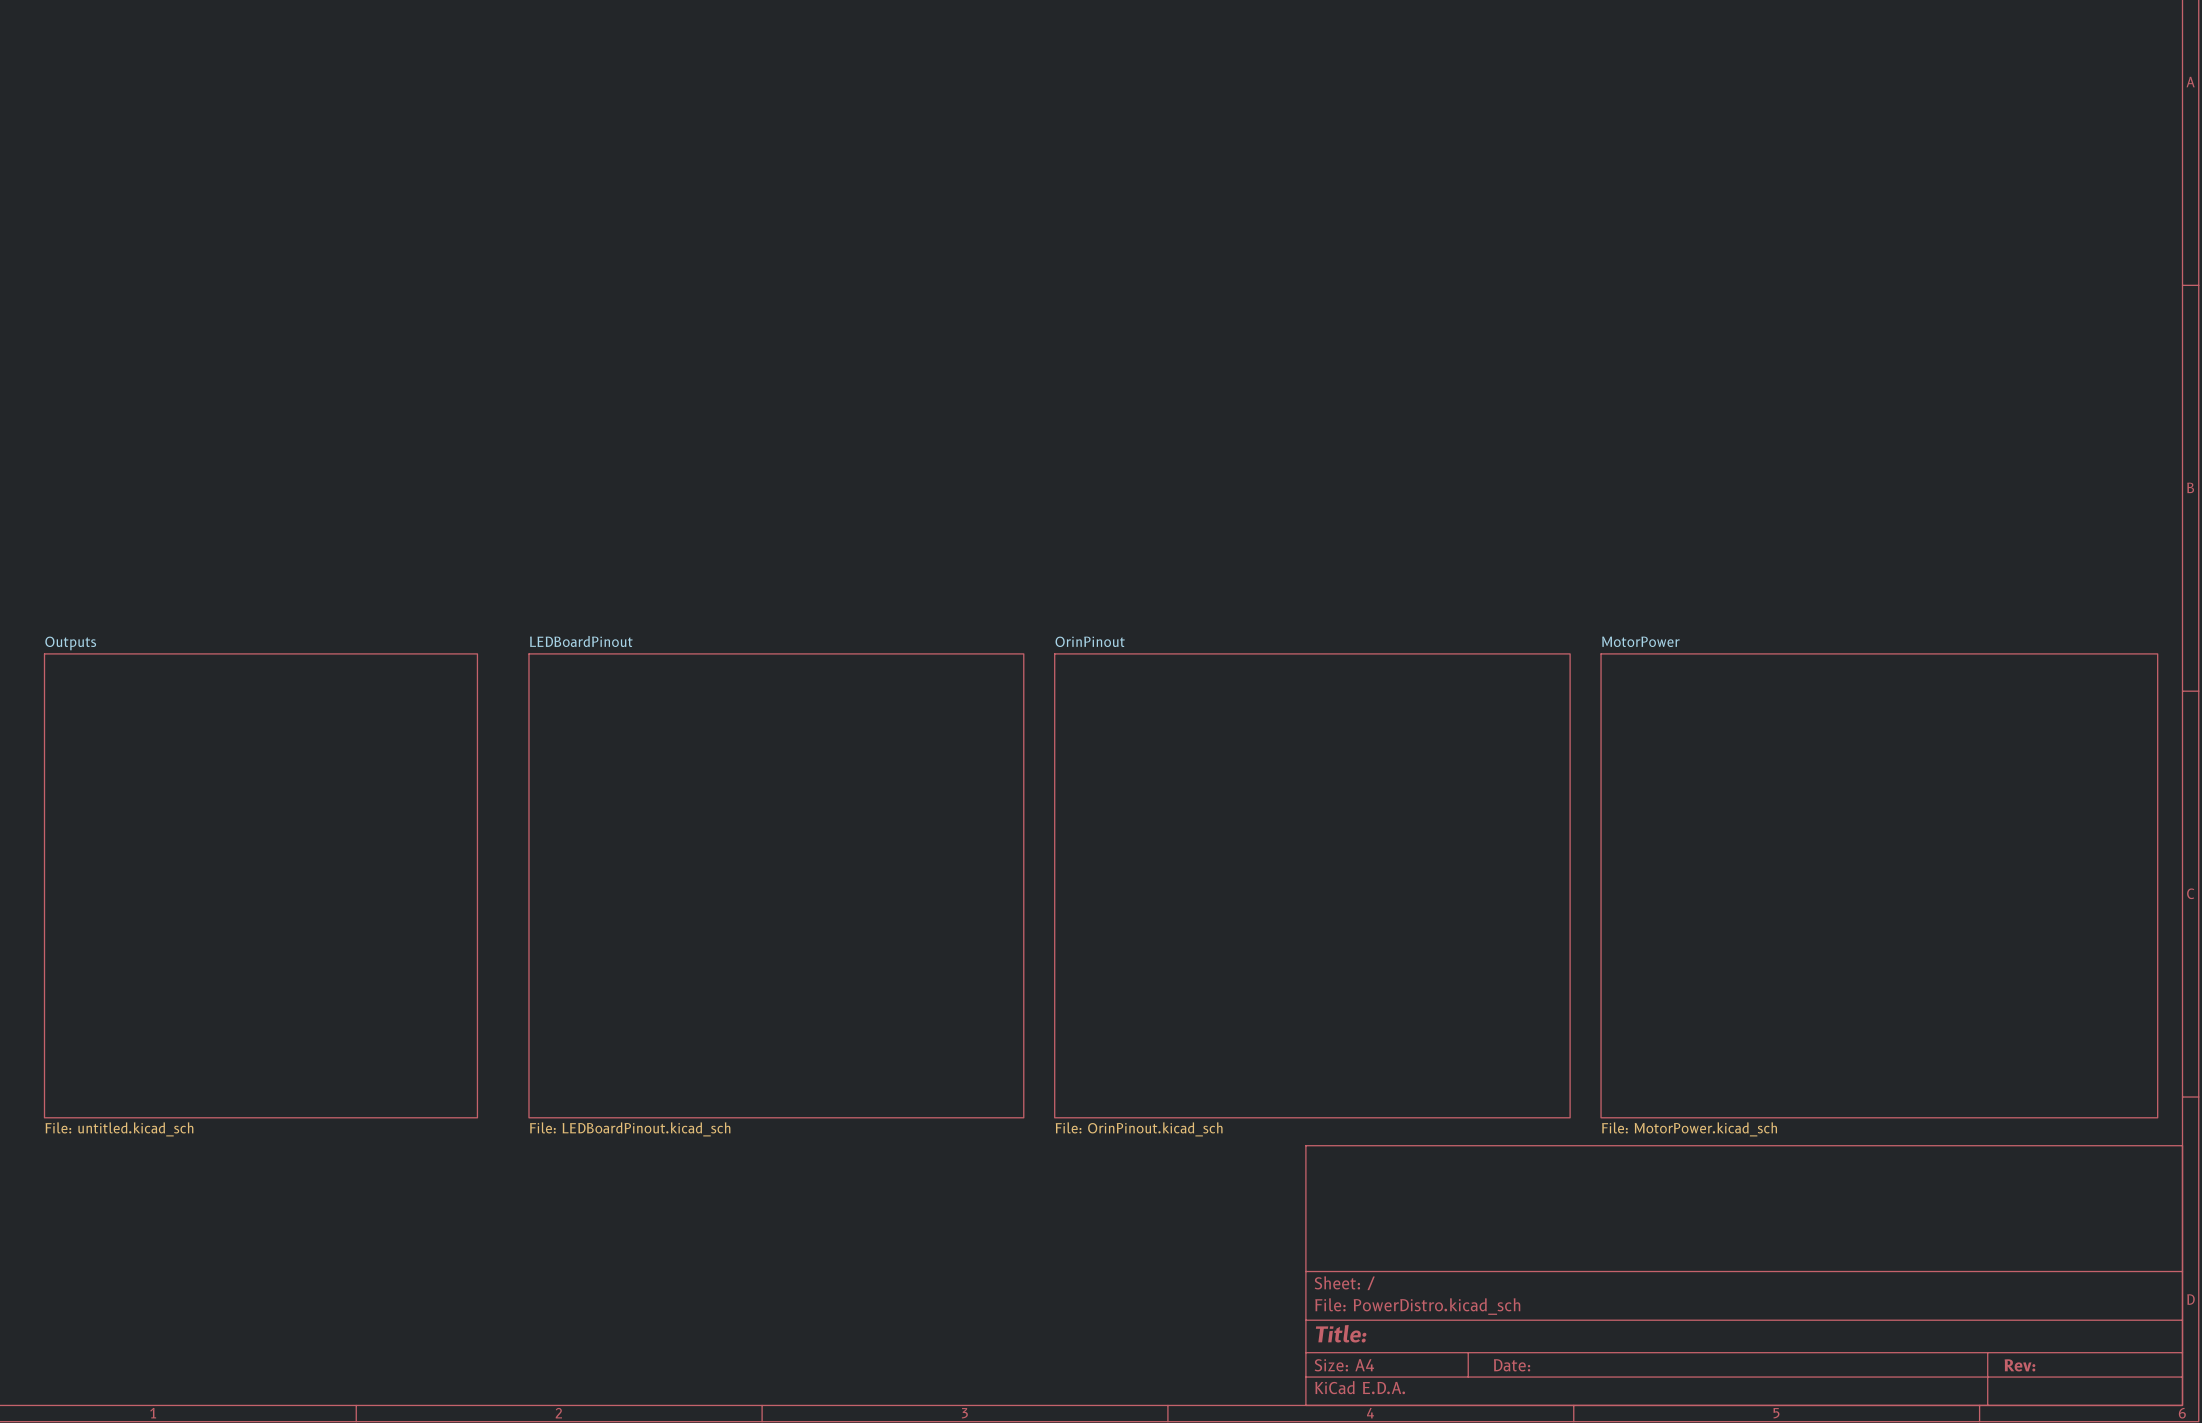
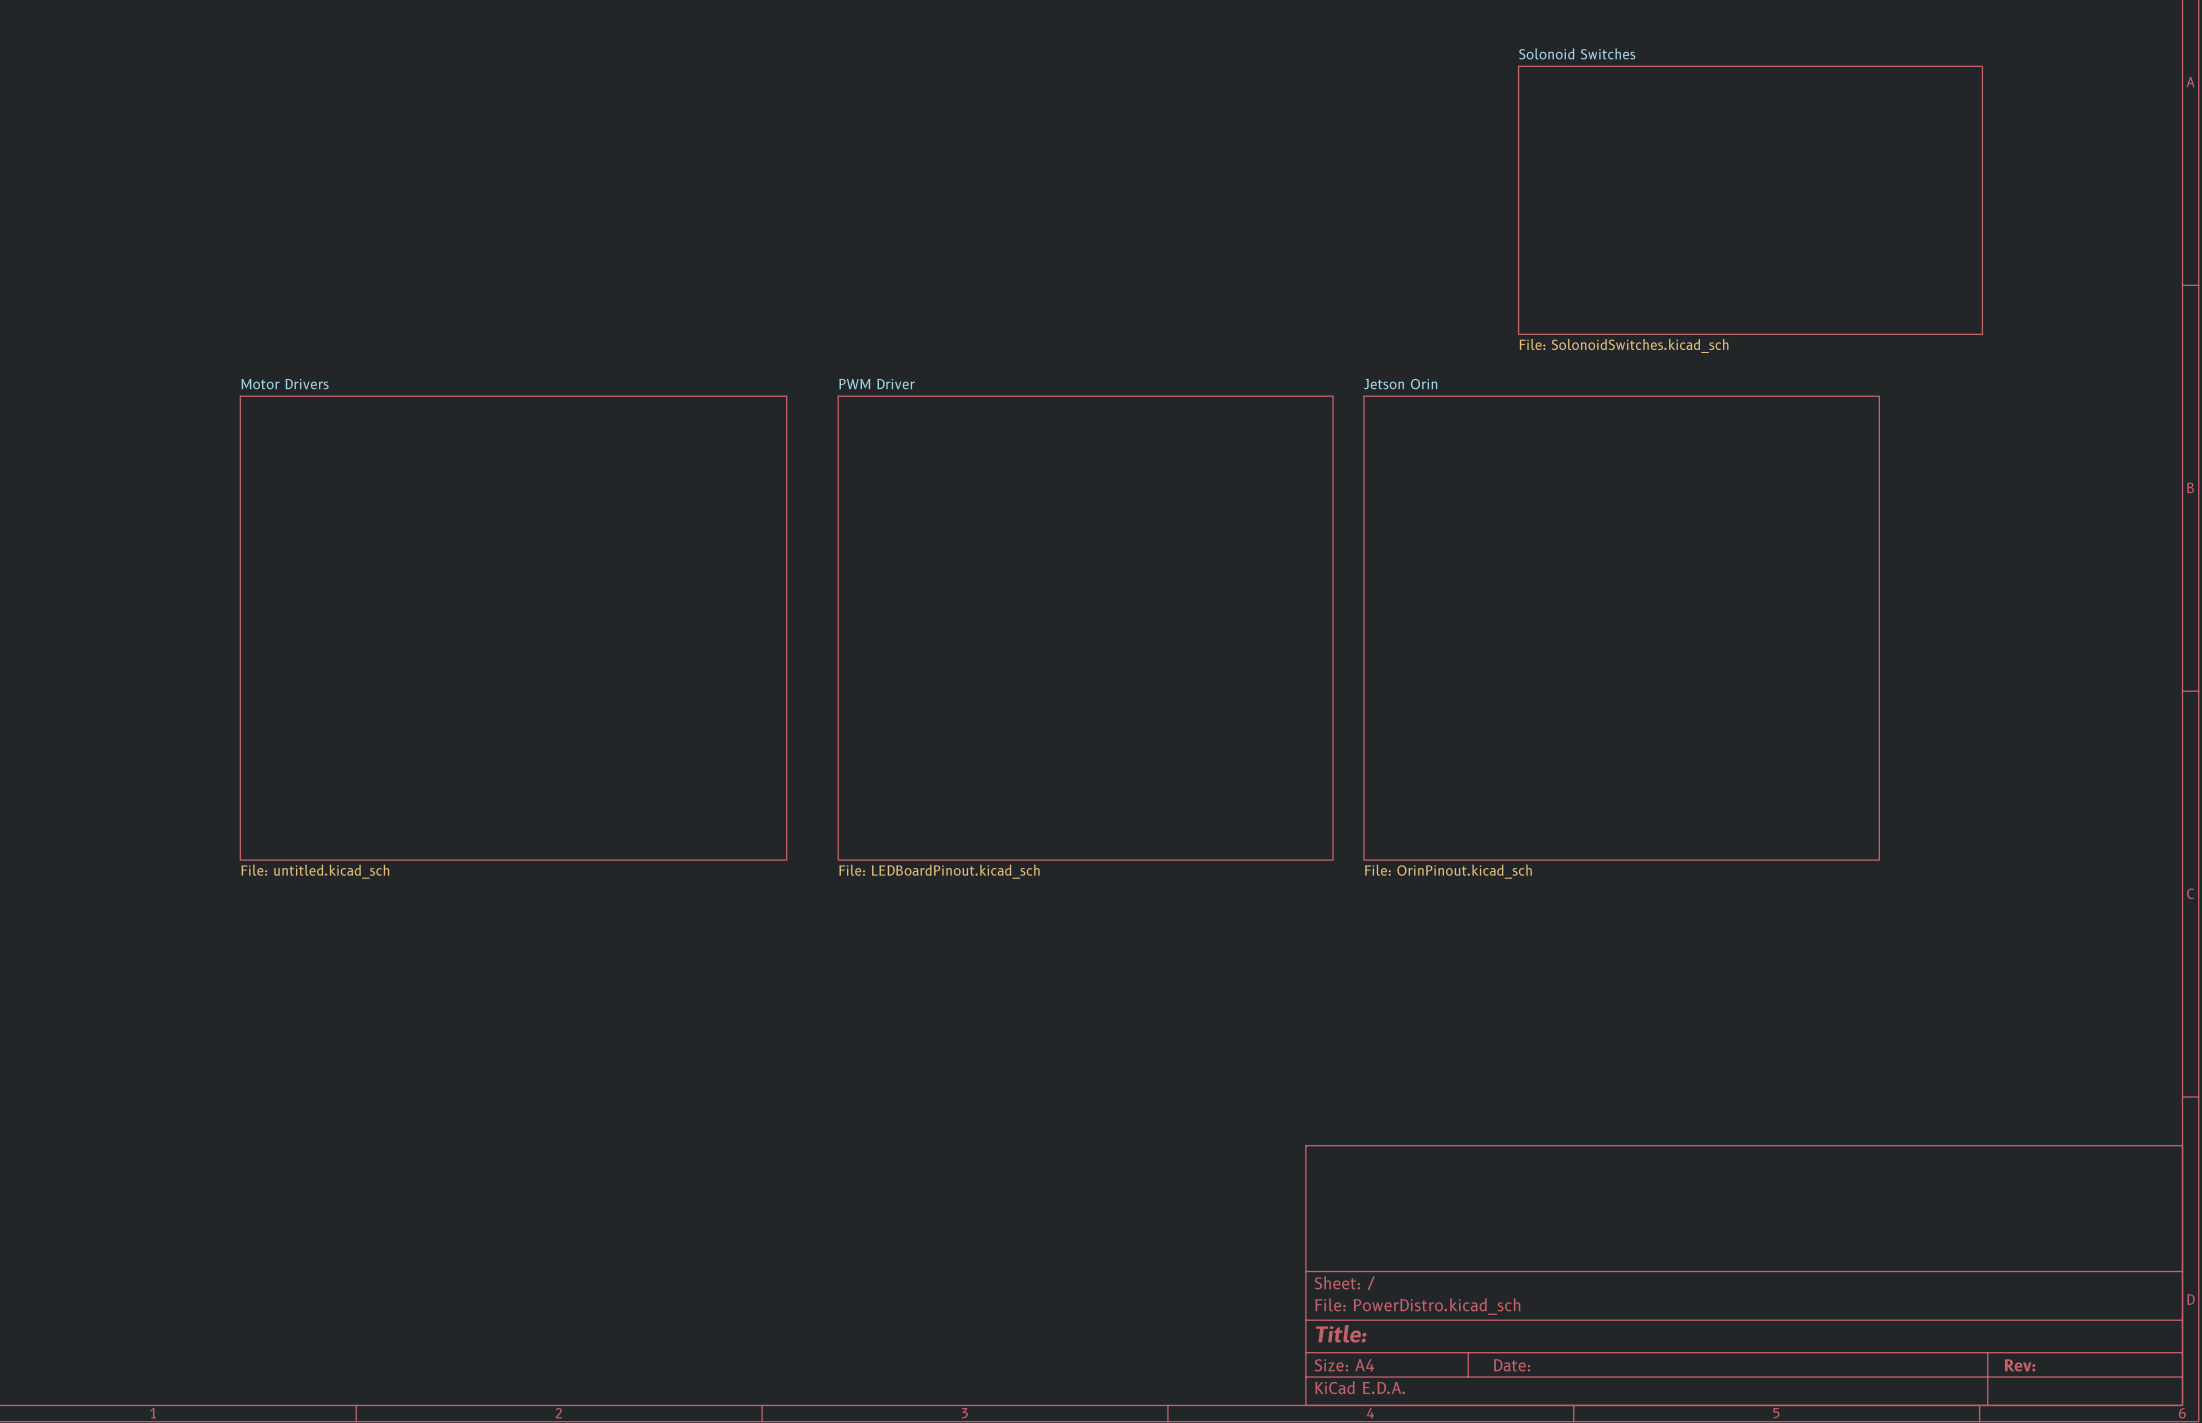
sheet Solonoid Switches: none -> File: SolonoidSwitches.kicad_sch (1750, 200)
sheet Motor Drivers: none -> File: untitled.kicad_sch (513, 628)
sheet PWM Driver: none -> File: LEDBoardPinout.kicad_sch (1085, 628)
sheet Jetson Orin: none -> File: OrinPinout.kicad_sch (1621, 628)
sheet Outputs: File: untitled.kicad_sch (260, 885) -> none
sheet LEDBoardPinout: File: LEDBoardPinout.kicad_sch (776, 885) -> none
sheet OrinPinout: File: OrinPinout.kicad_sch (1312, 885) -> none
sheet MotorPower: File: MotorPower.kicad_sch (1879, 885) -> none

